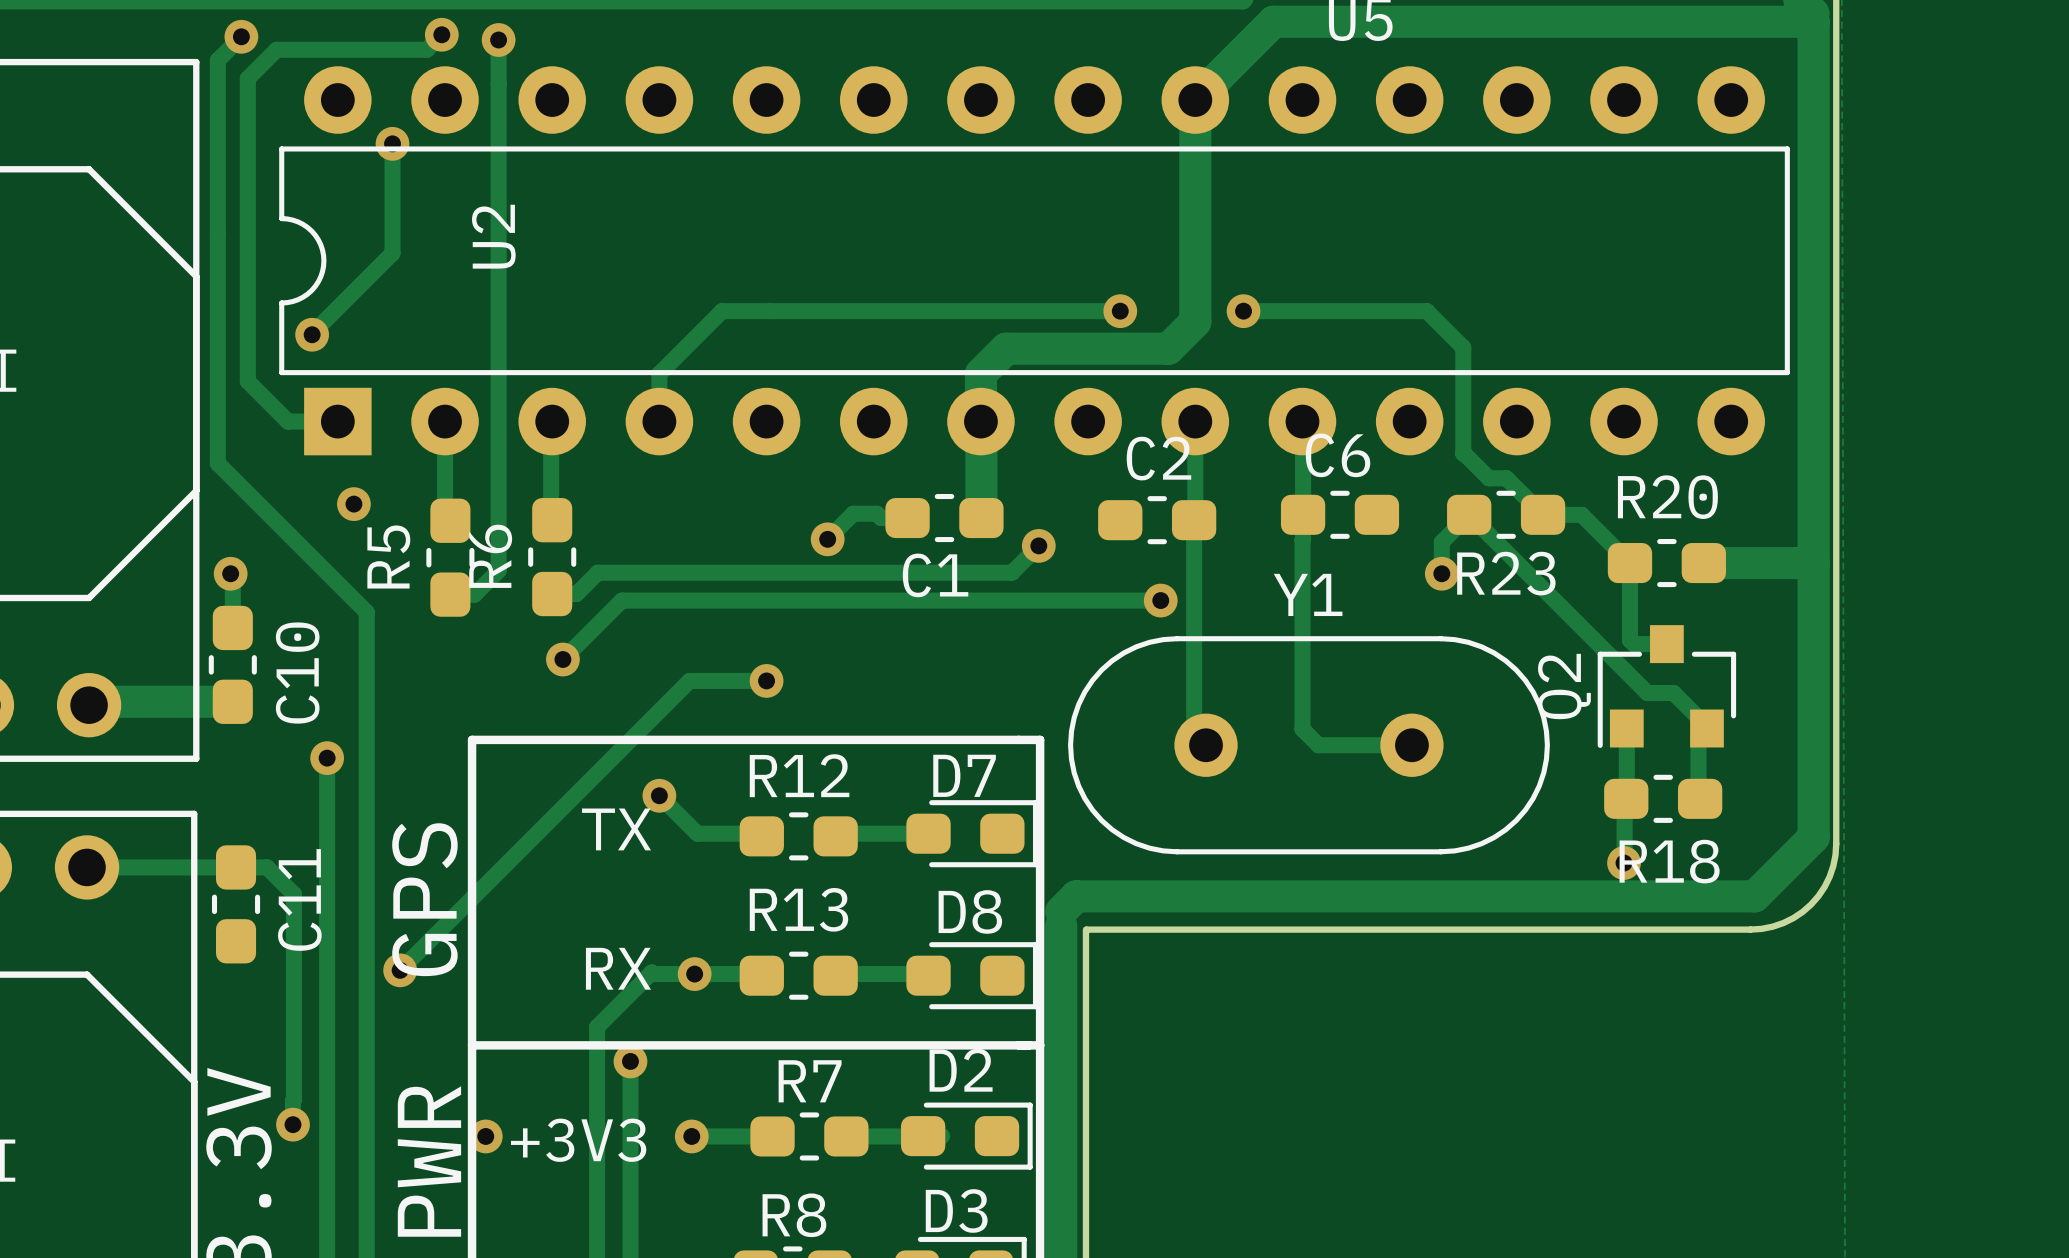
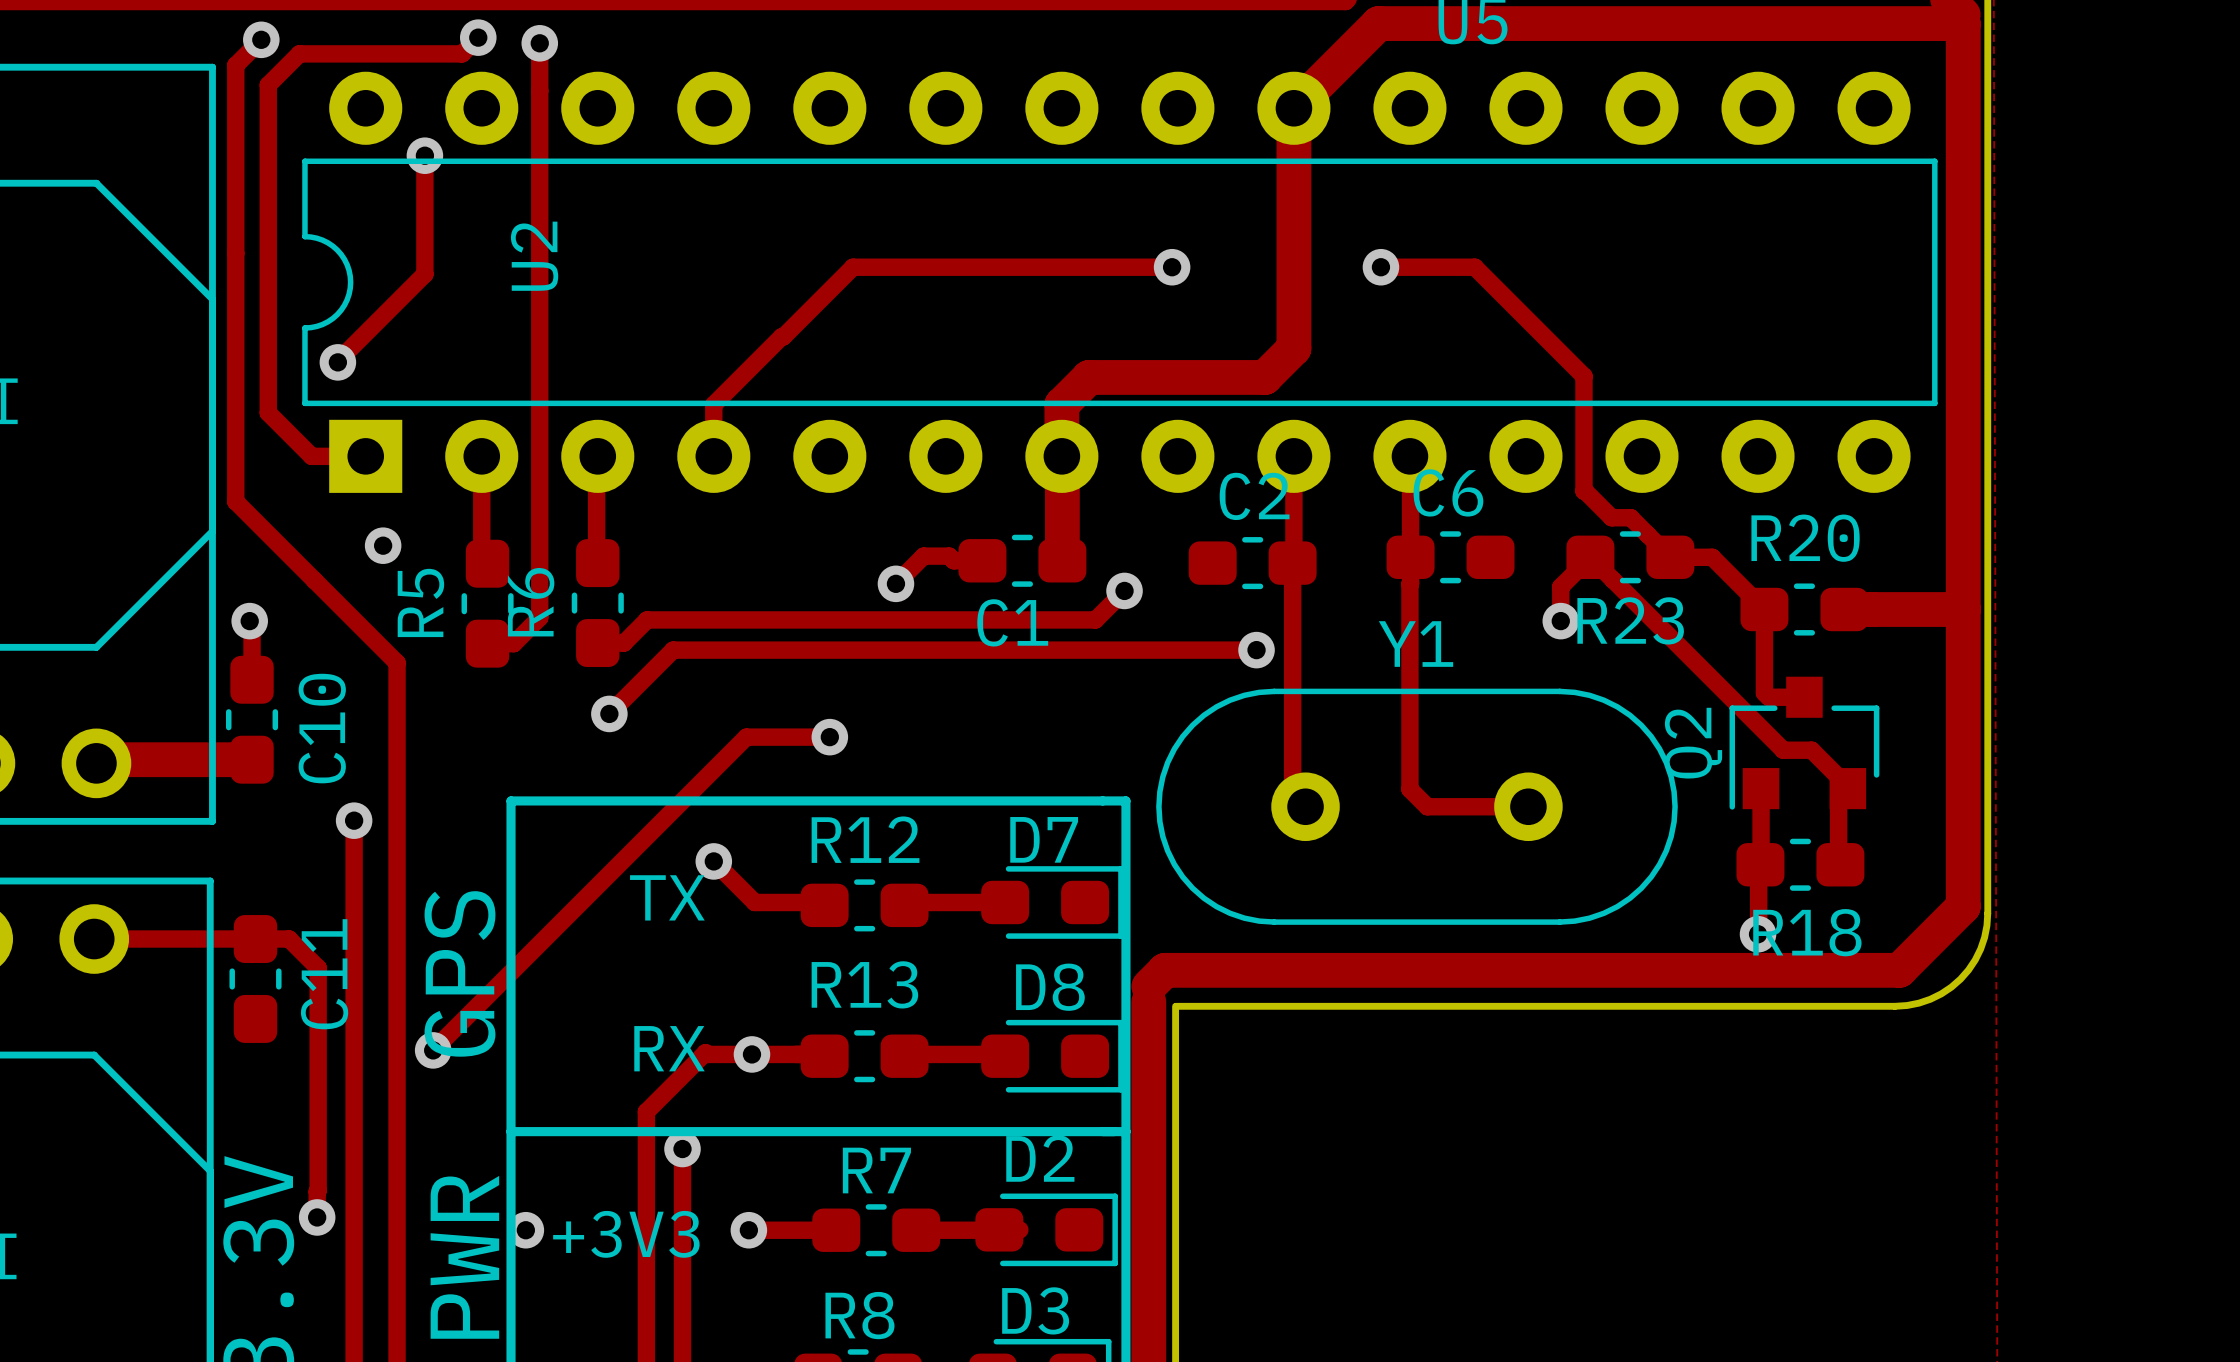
track: (723, 311) (1120, 311) -> (783, 336) (853, 267) (1172, 267)
via position: (1120, 311) -> (1172, 267)
track: (1243, 311) (1426, 311) -> (1380, 267) (1474, 267) (1544, 336)
via position: (1243, 311) -> (1380, 267)

